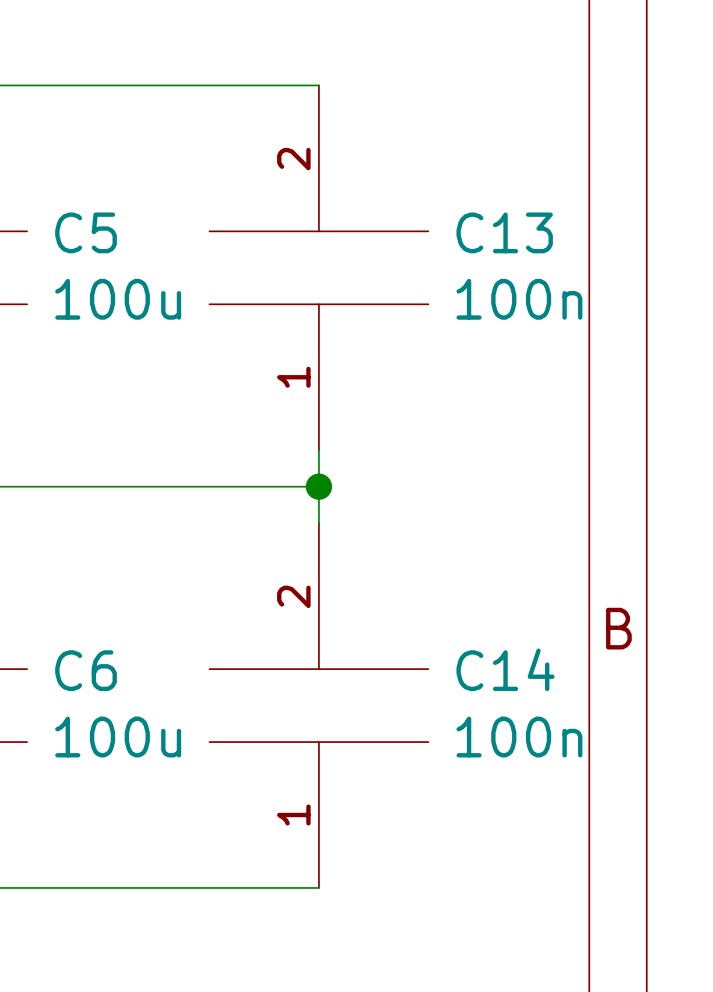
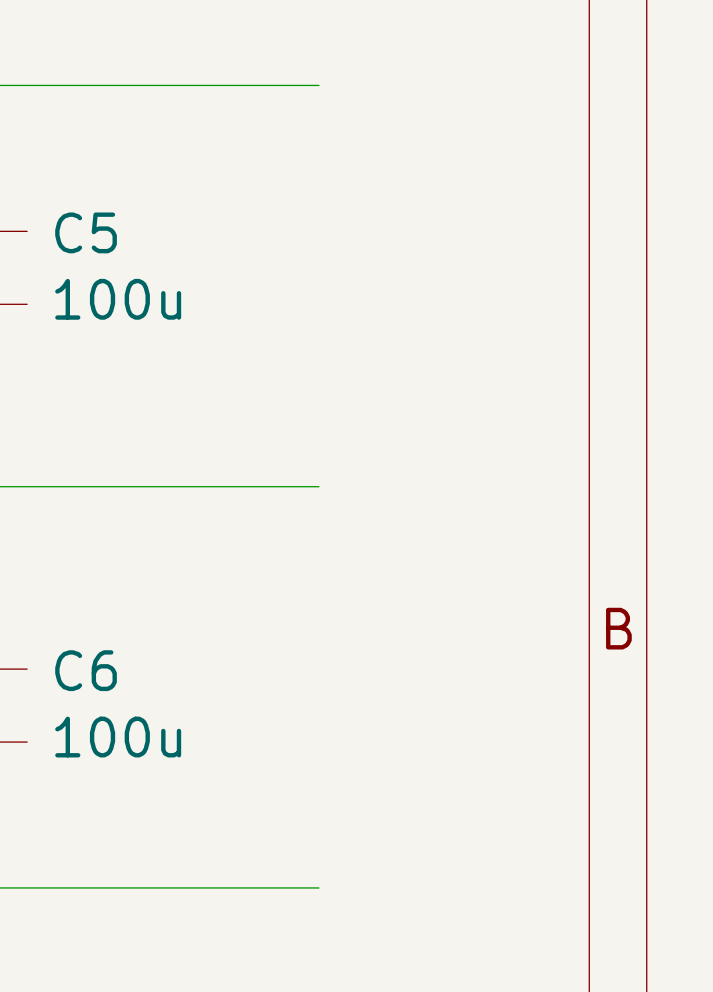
C13: 100n (318, 267) -> none
wire: (318, 450) (318, 523) -> none
junction: (318, 486) -> none
C14: 100n (318, 705) -> none

